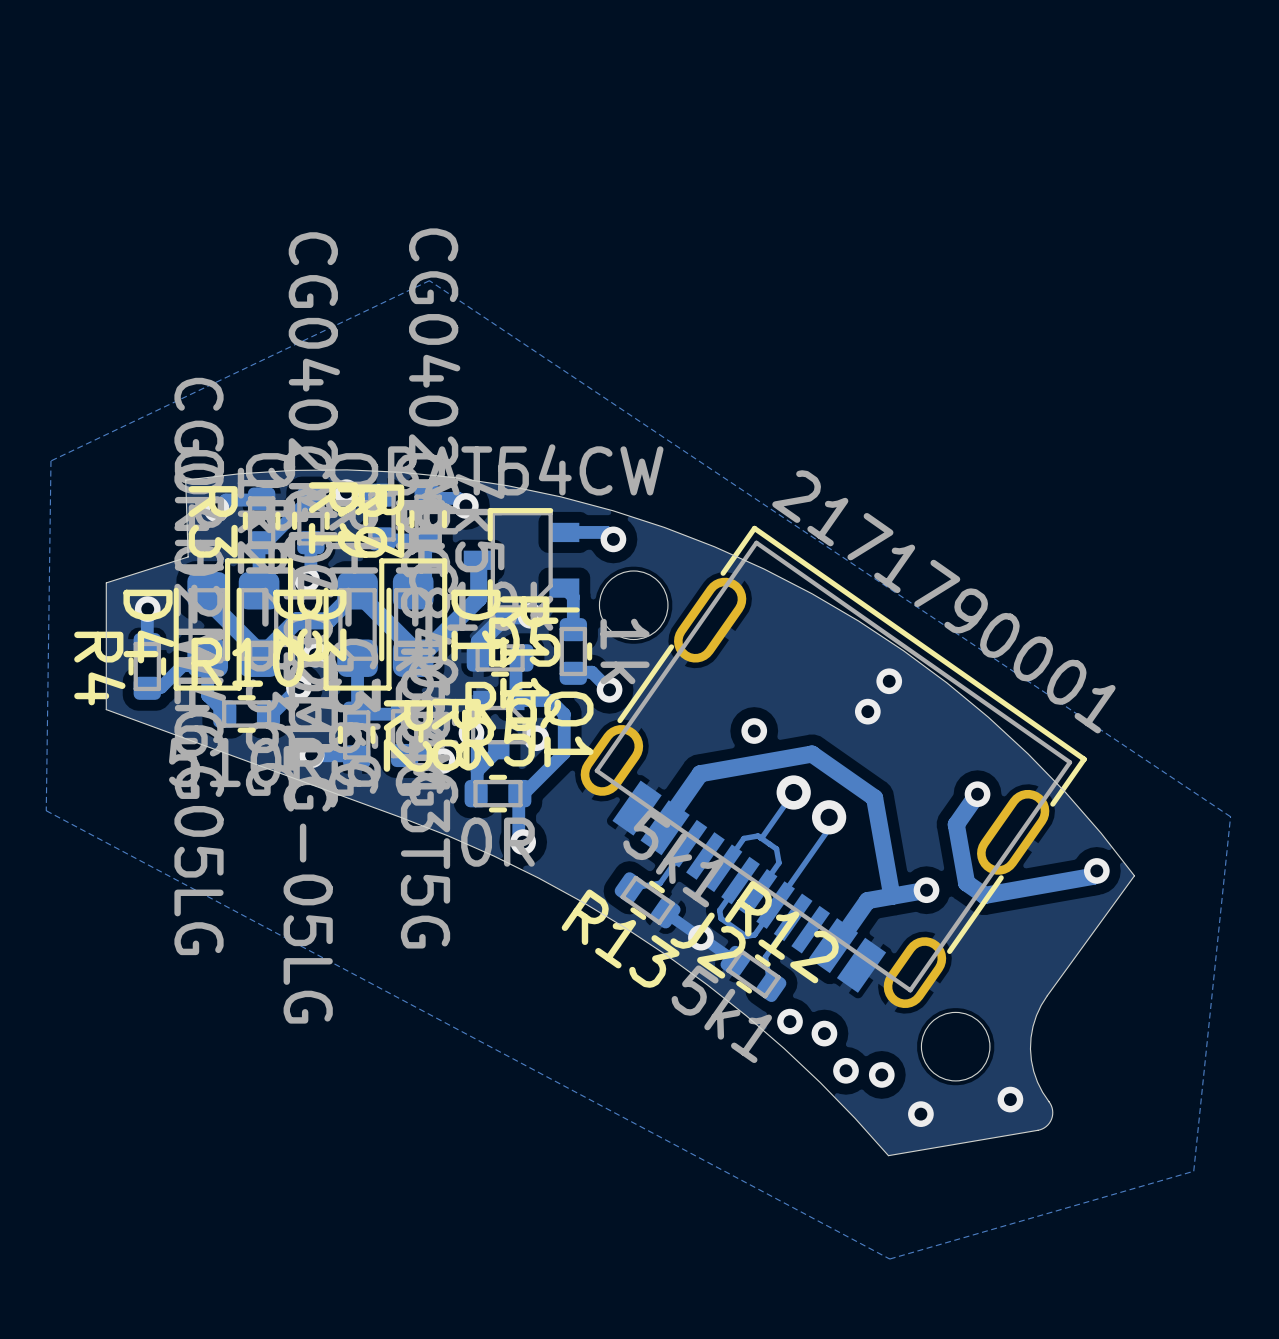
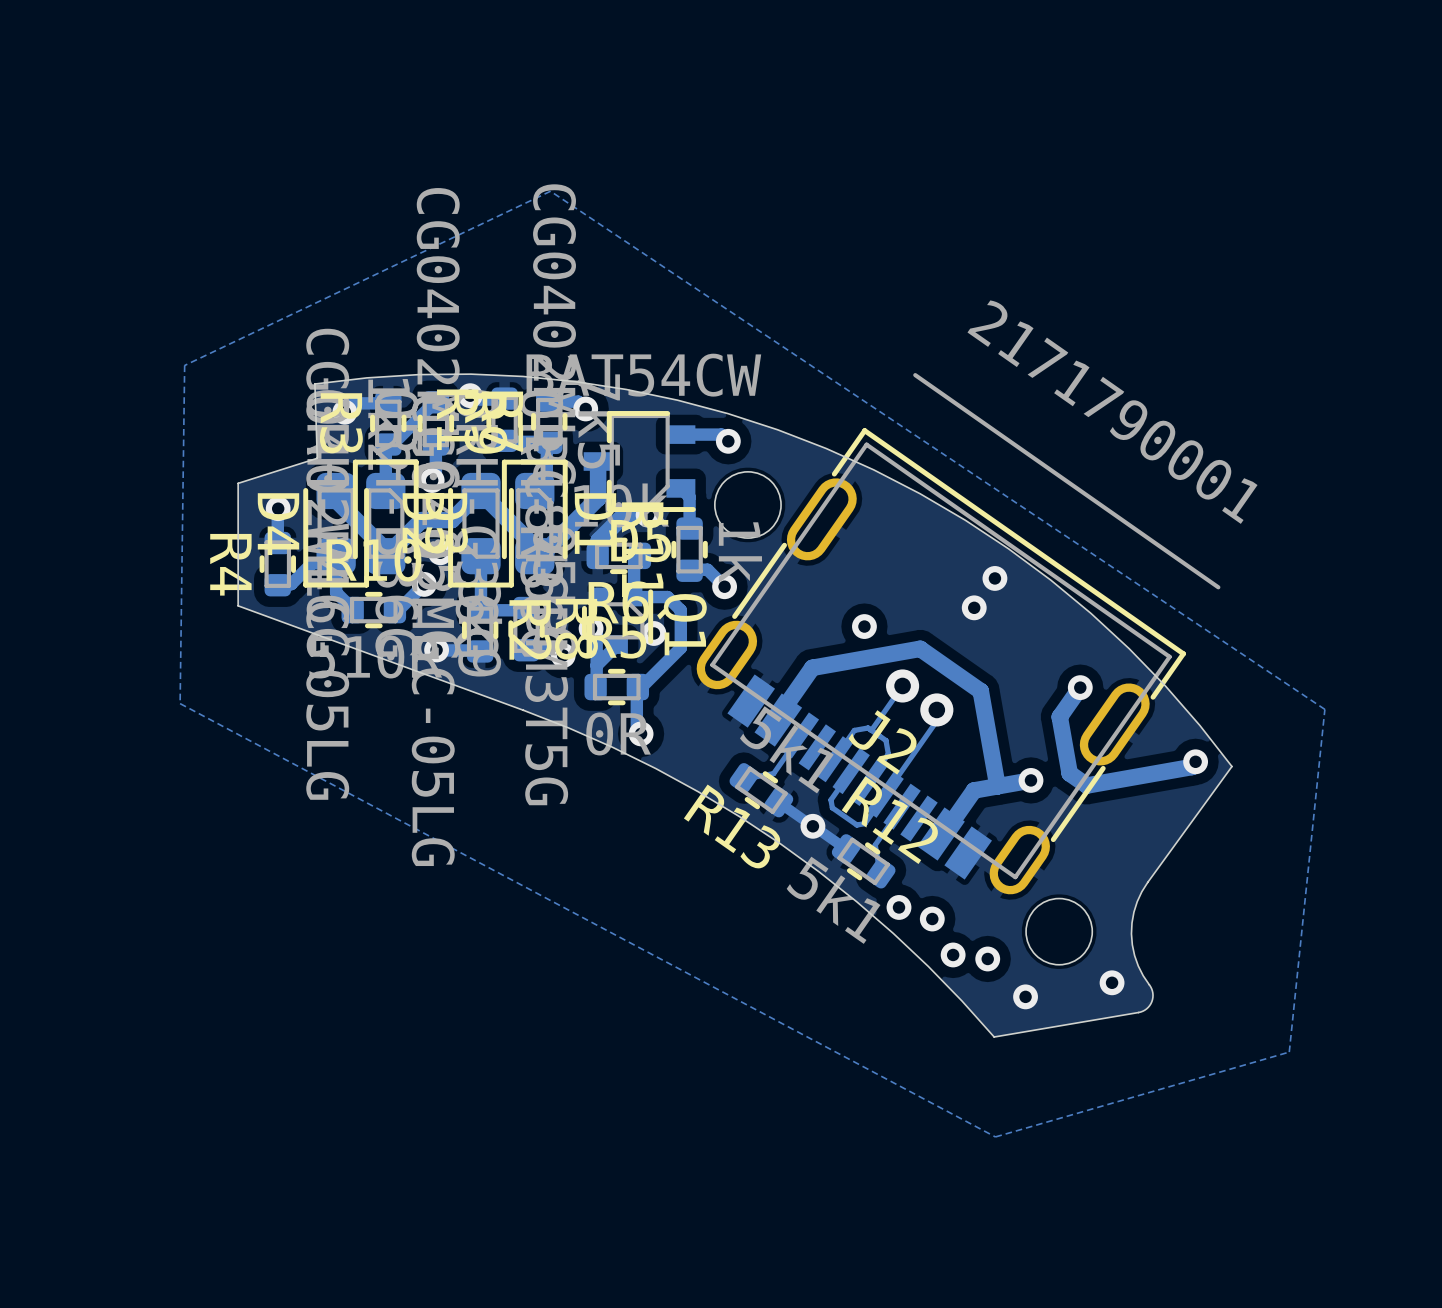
J2 footprint: [580, 525, 1087, 1009] -> [696, 373, 1221, 895]

